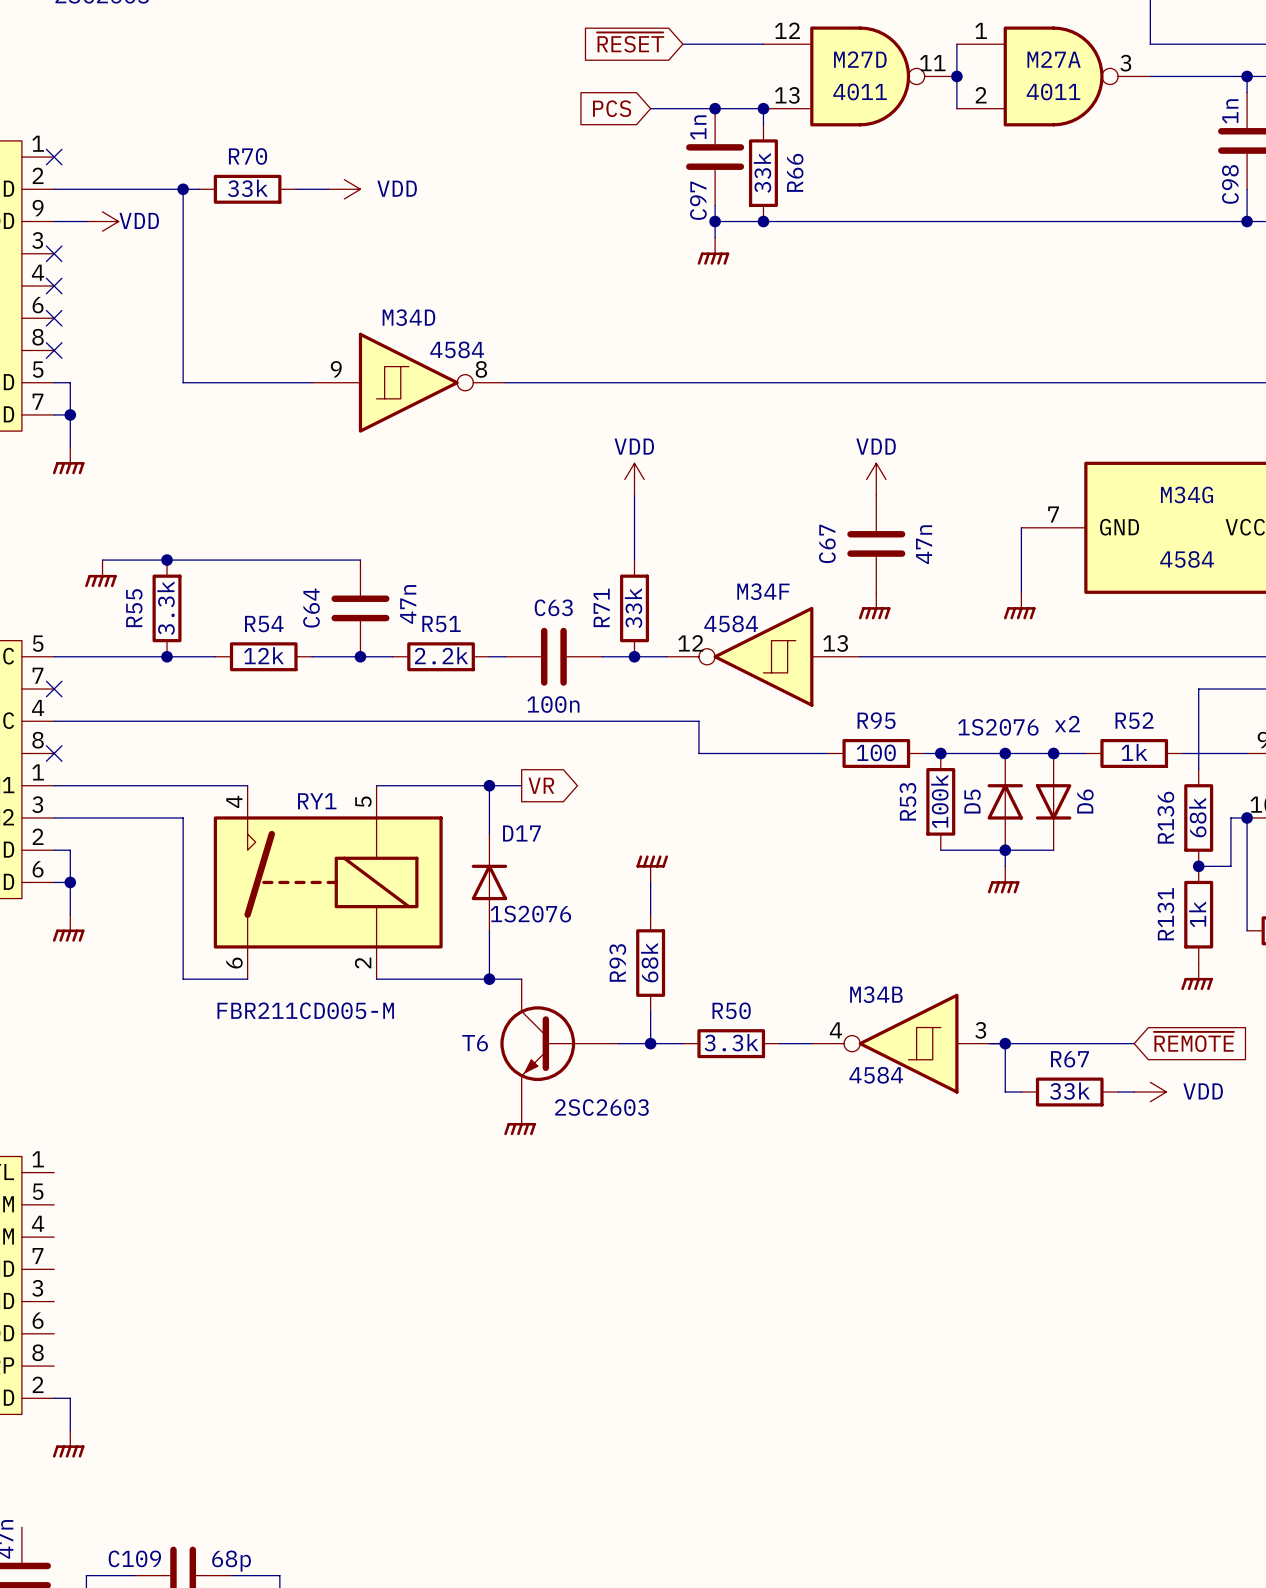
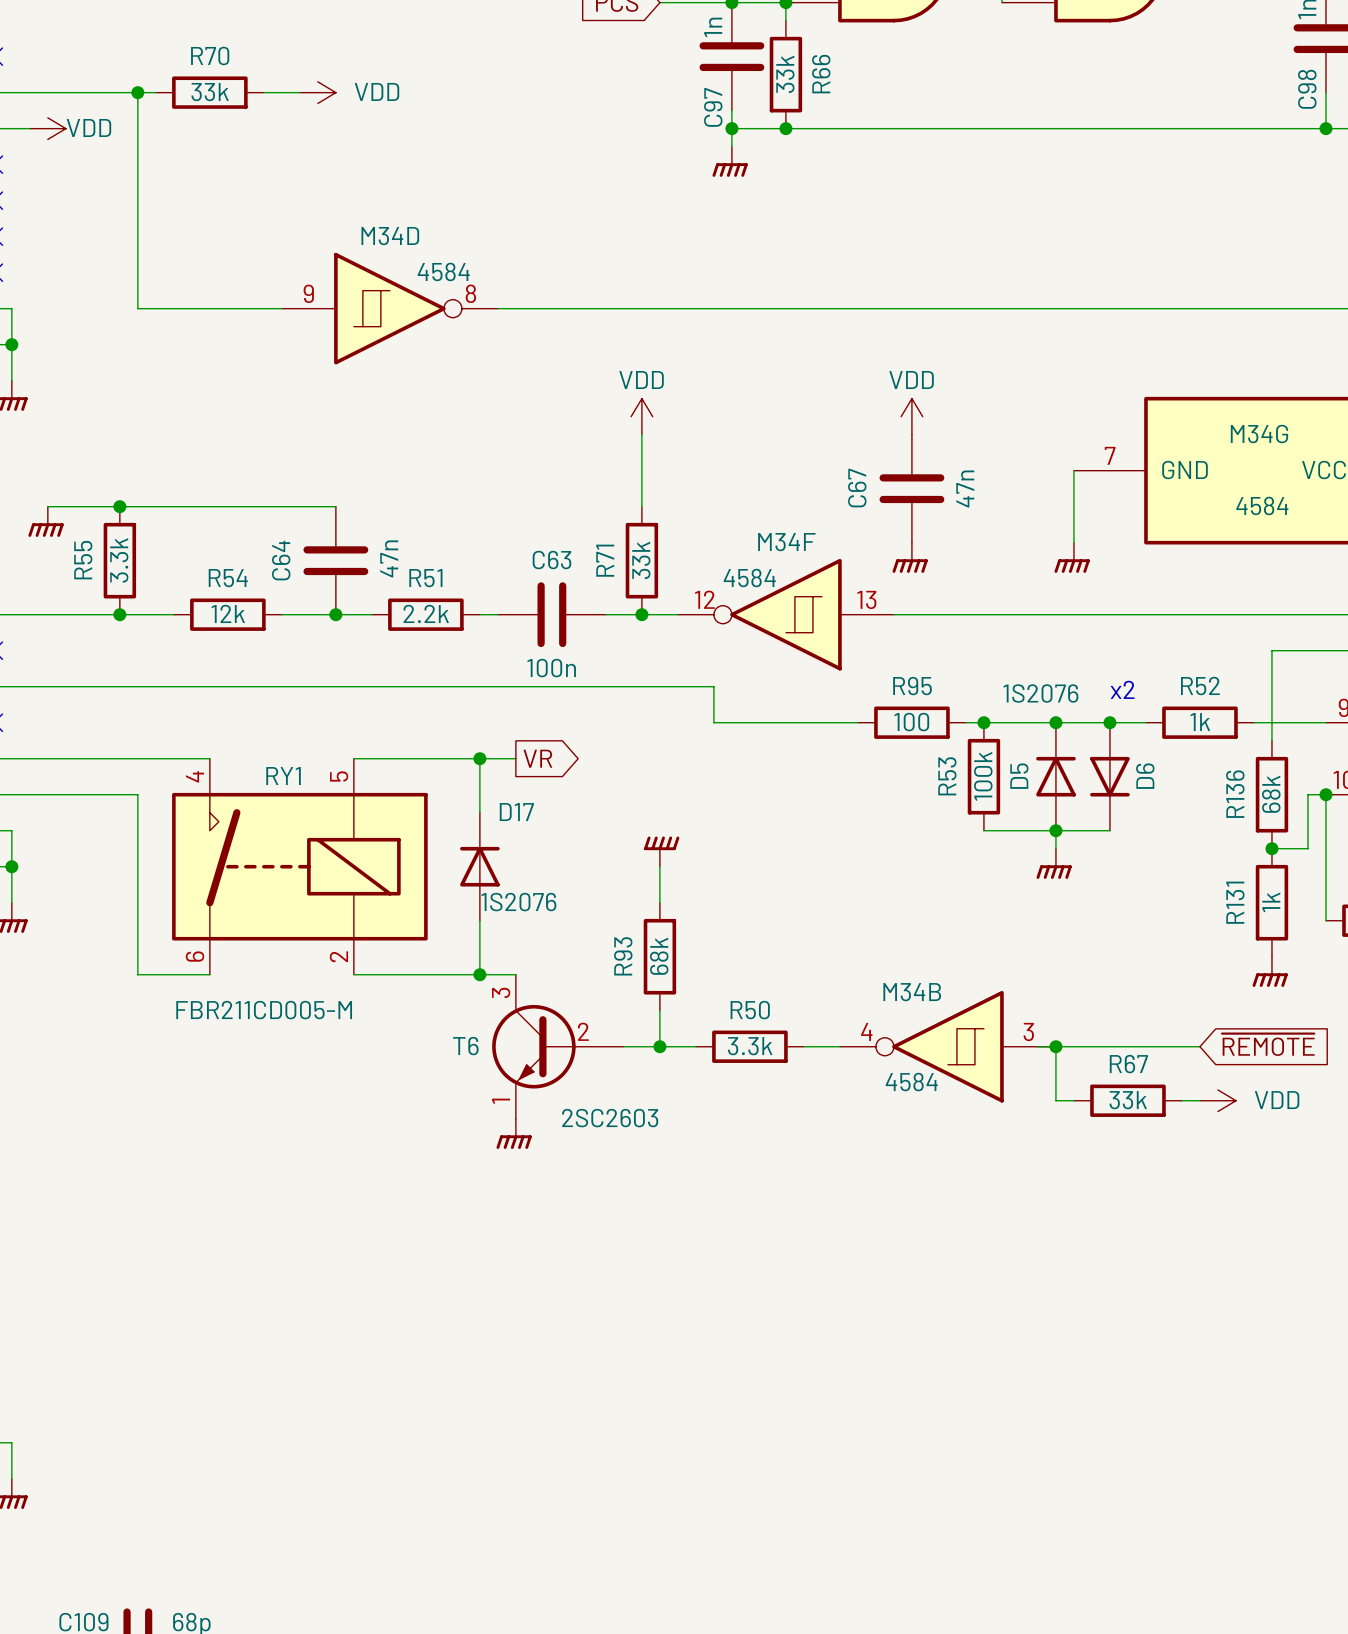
T6 pin number: none -> 3 (501, 992)
T6 pin number: none -> 2 (583, 1031)
T6 pin number: none -> 1 (501, 1101)

